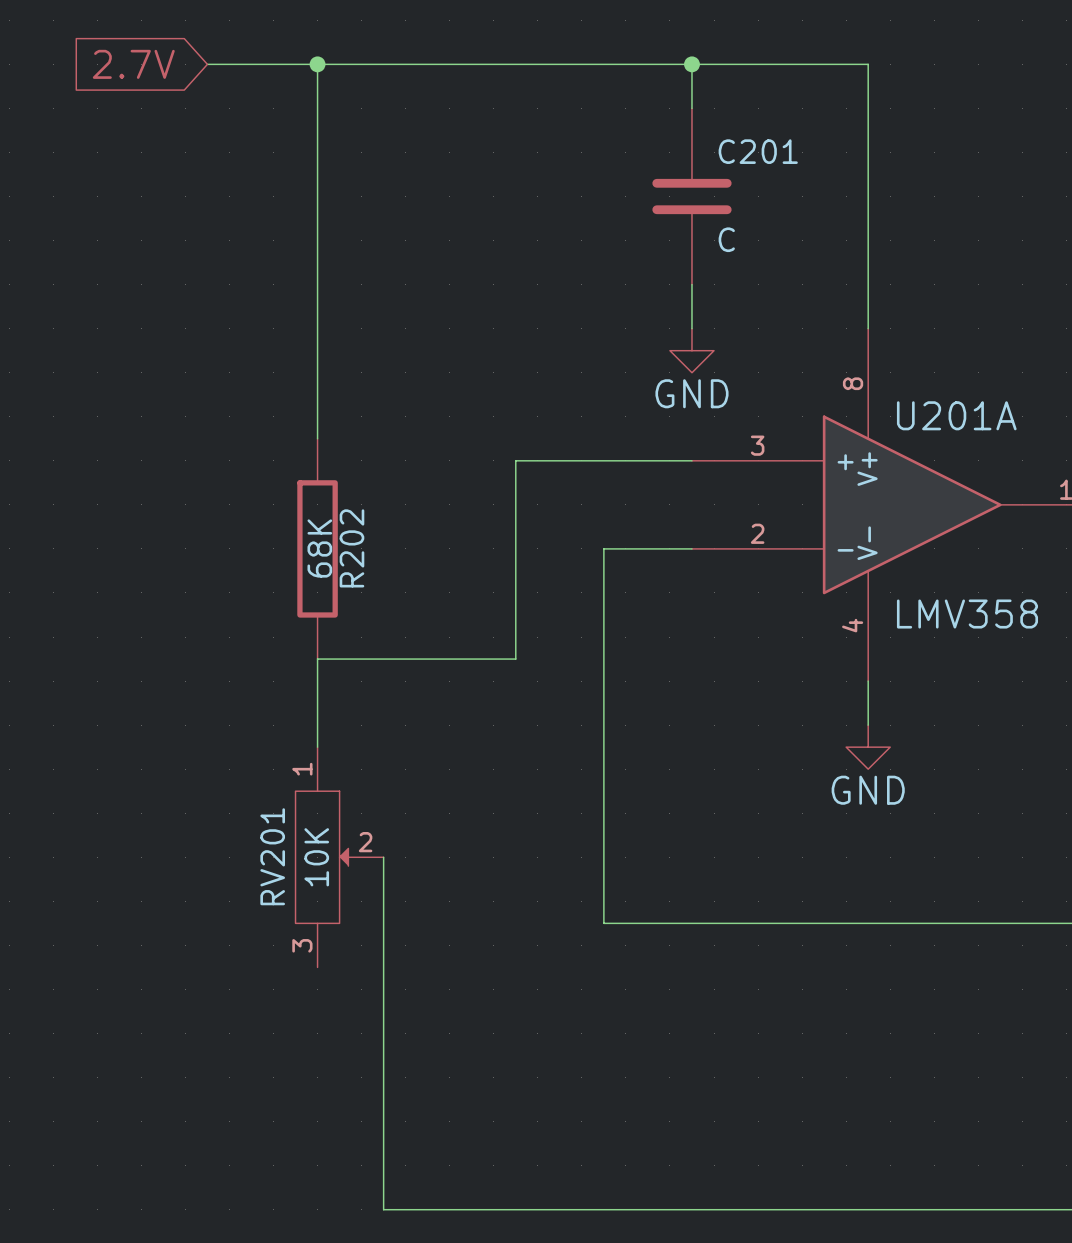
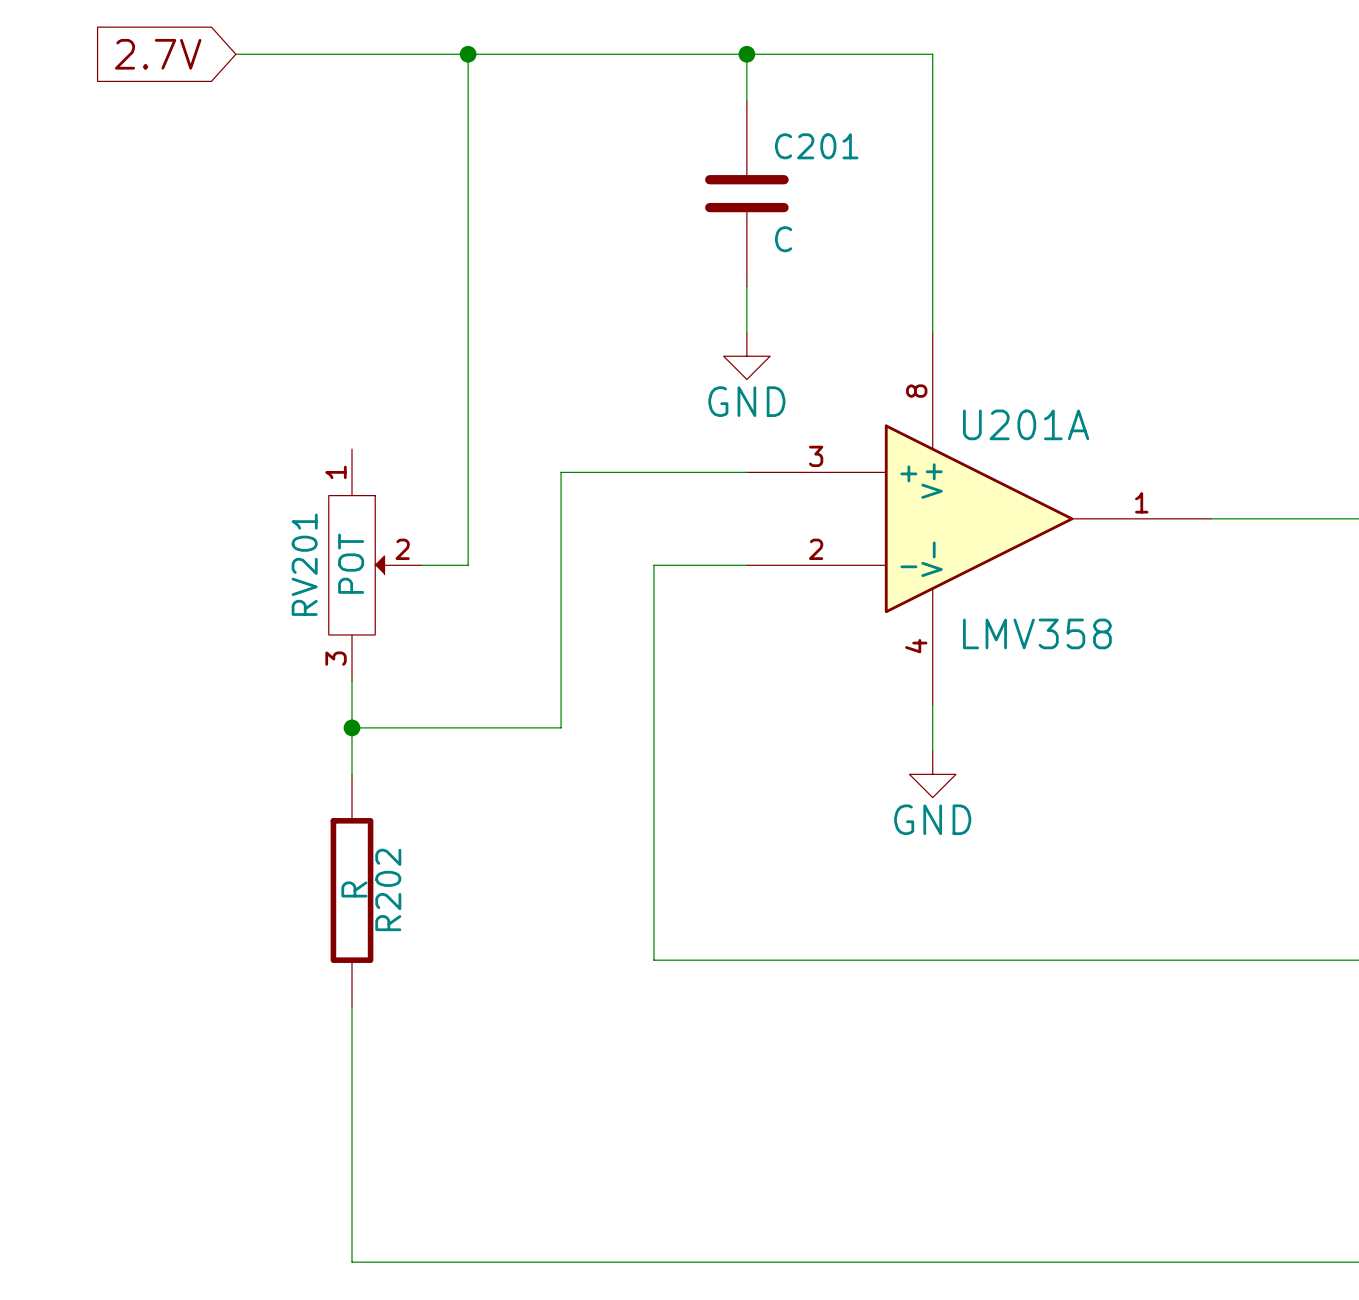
wire: (317, 64) (317, 438) -> none
junction: (317, 64) -> none
wire: none -> (468, 54) (468, 565) (421, 565)
junction: none -> (468, 54)
R202 position: (317, 548) -> (352, 890)
R202 value: 68K (319, 548) -> R (354, 889)
wire: (317, 659) (515, 659) -> (352, 727) (561, 727) (561, 681)
junction: none -> (352, 727)
RV201 value: 10K (316, 857) -> POT (351, 563)
RV201 position: (339, 857) -> (375, 565)
wire: (383, 857) (383, 1209) -> (352, 1006) (352, 1262) (421, 1262)

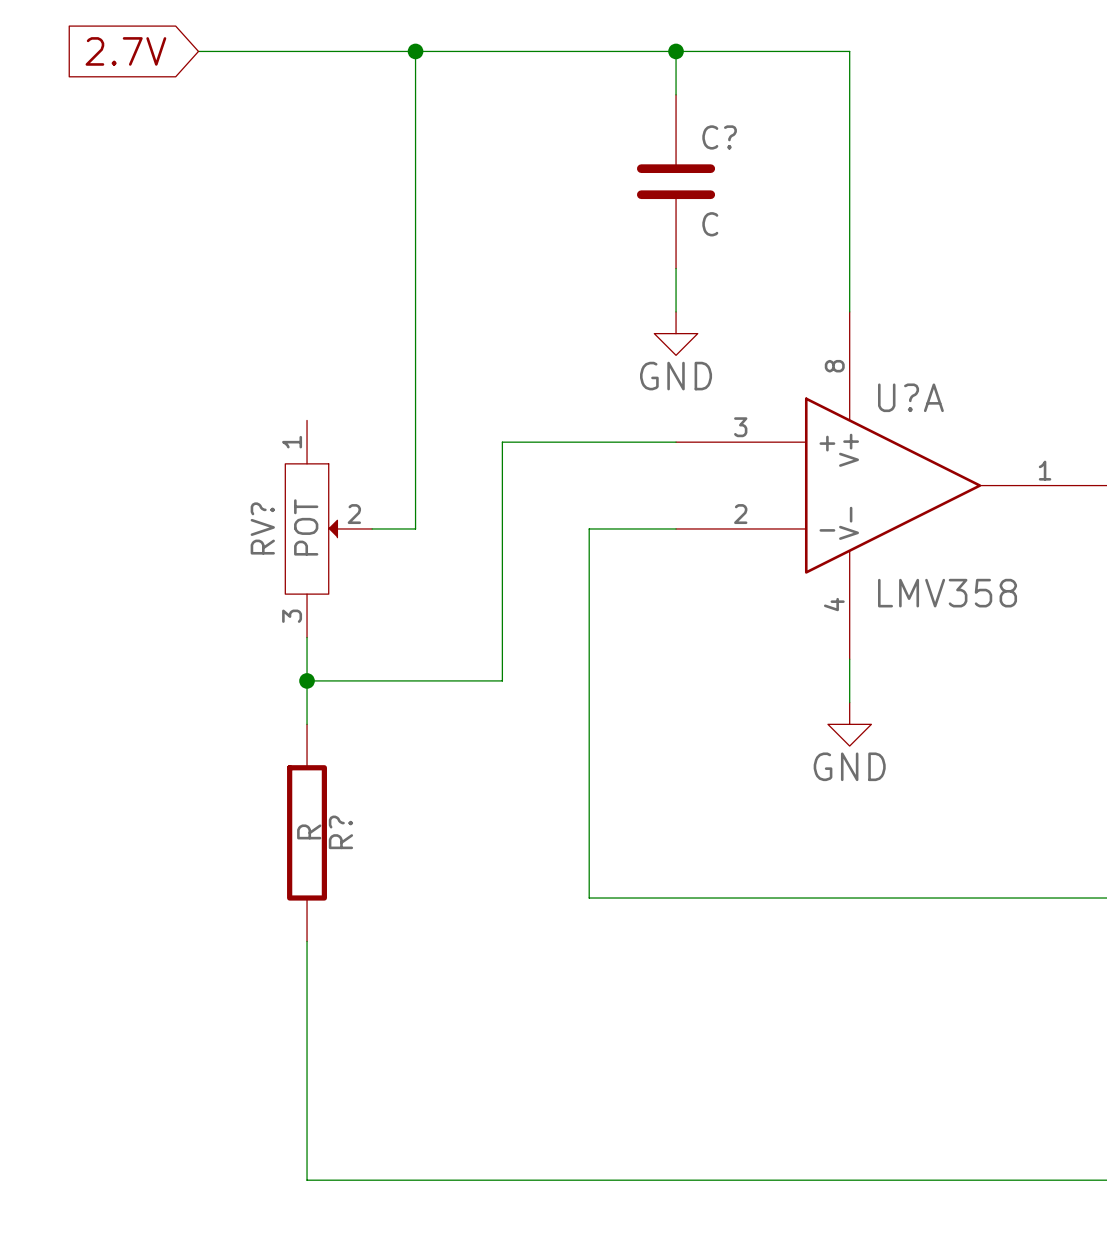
C201 name: C201 (816, 146) -> C? (719, 137)
U201A name: U201A (1026, 424) -> U?A (910, 397)
RV201 name: RV201 (304, 564) -> RV? (262, 528)
R202 name: R202 (388, 889) -> R? (340, 832)

